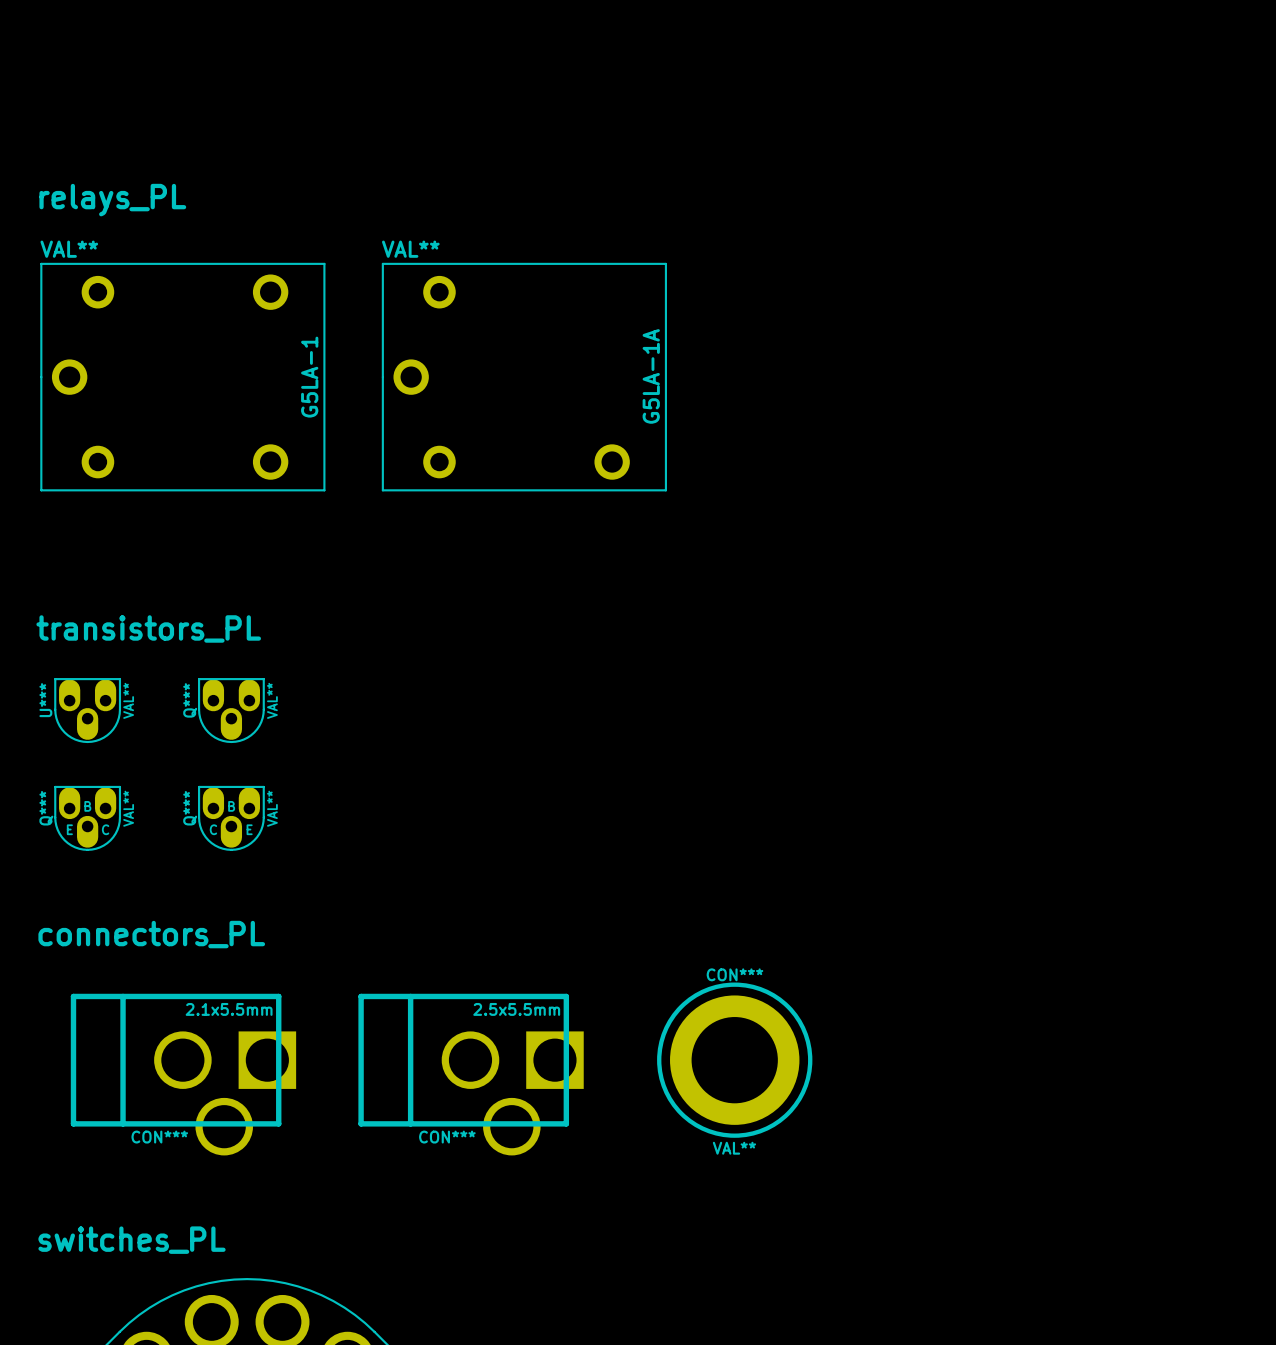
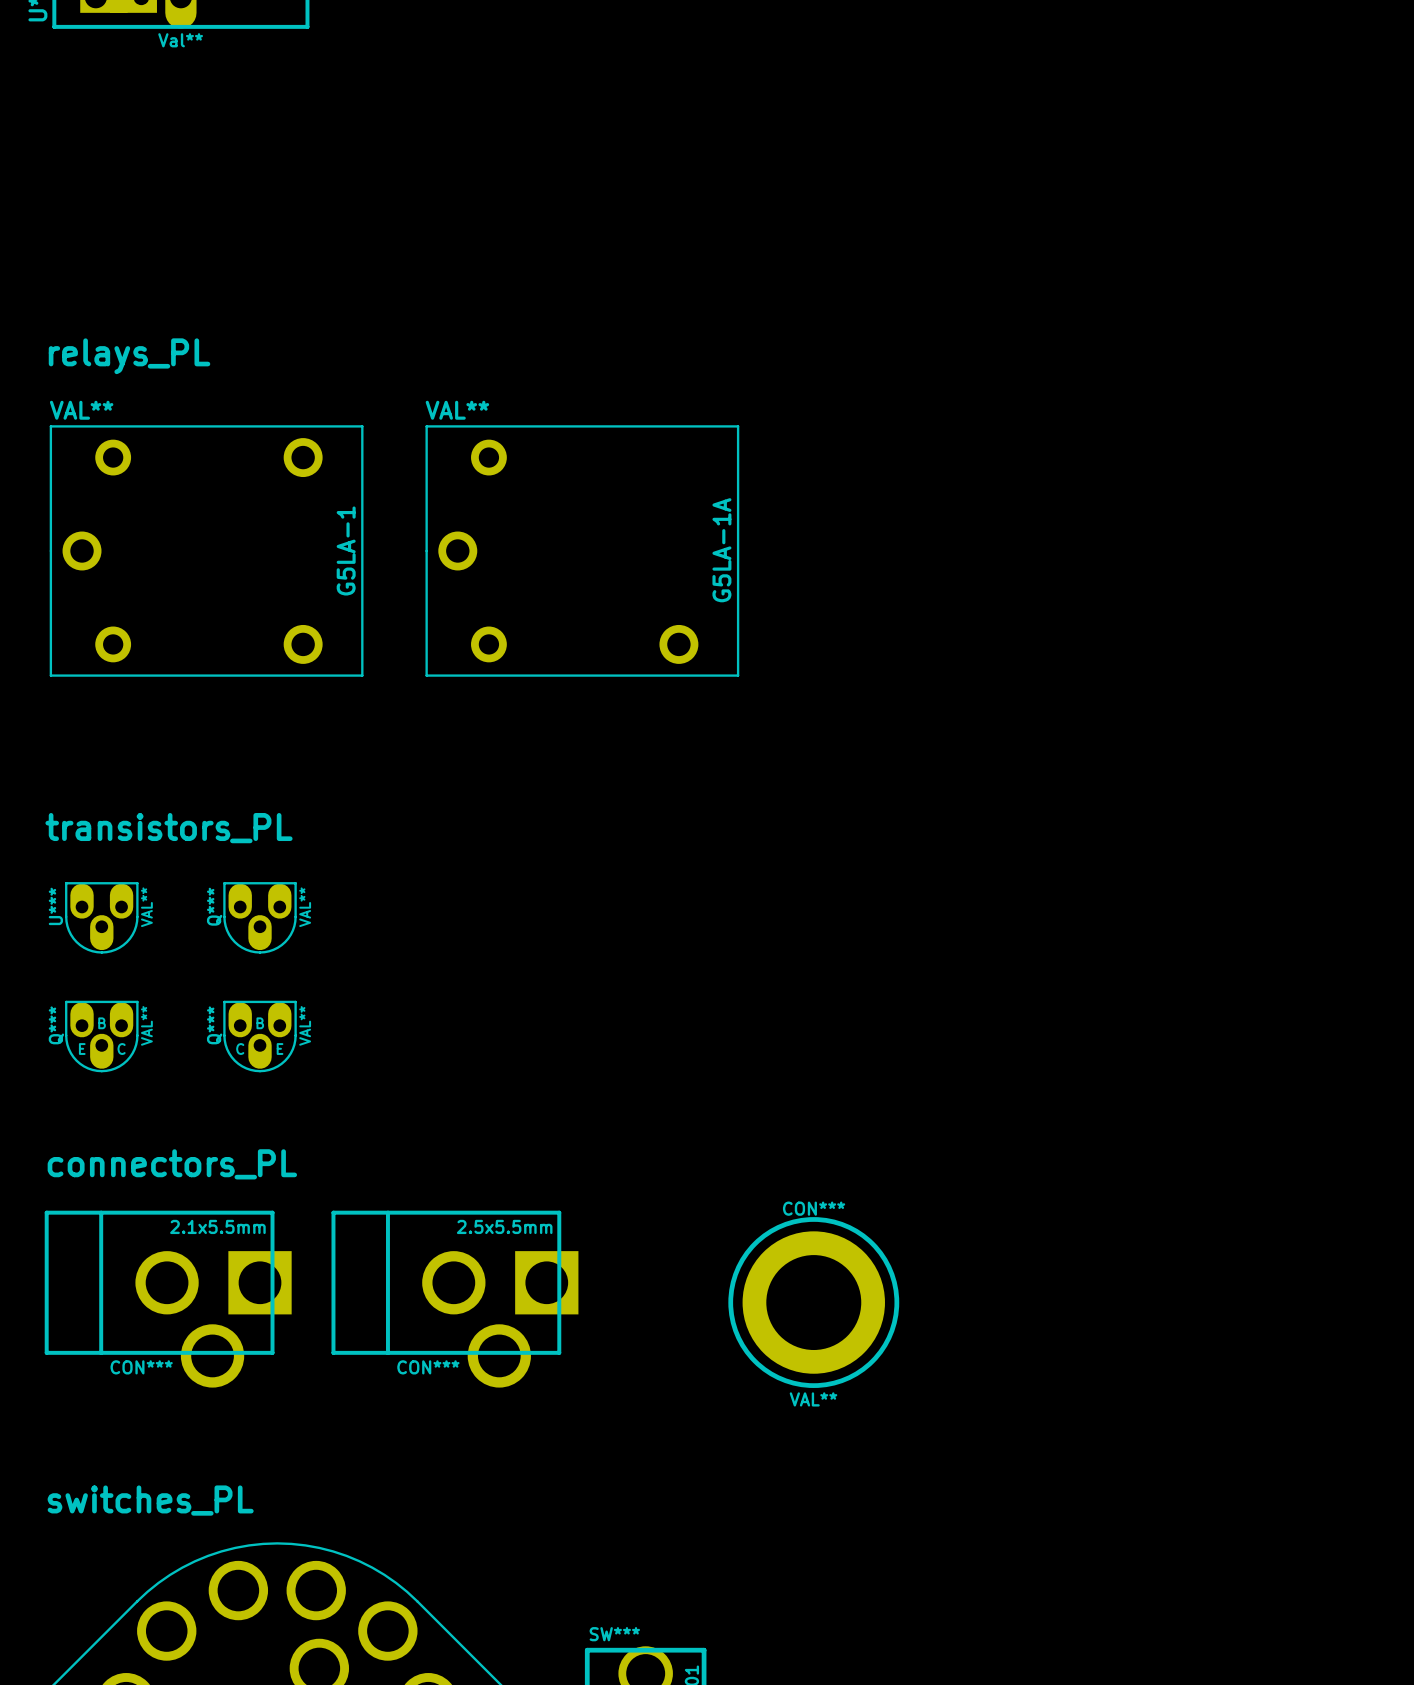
CON***: none -> (168, 1299)
CON***: none -> (454, 1299)
CON***: (183, 1074) -> none
CON***: (471, 1074) -> none

